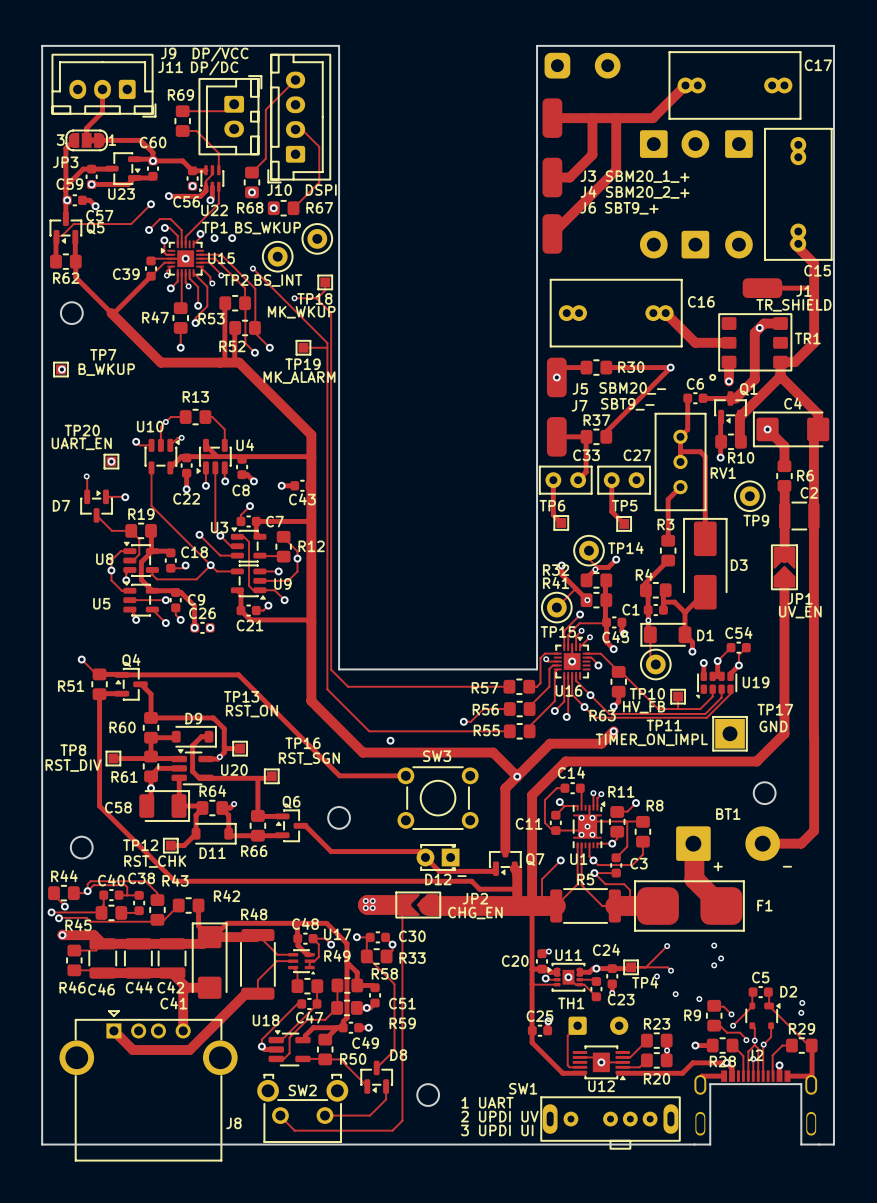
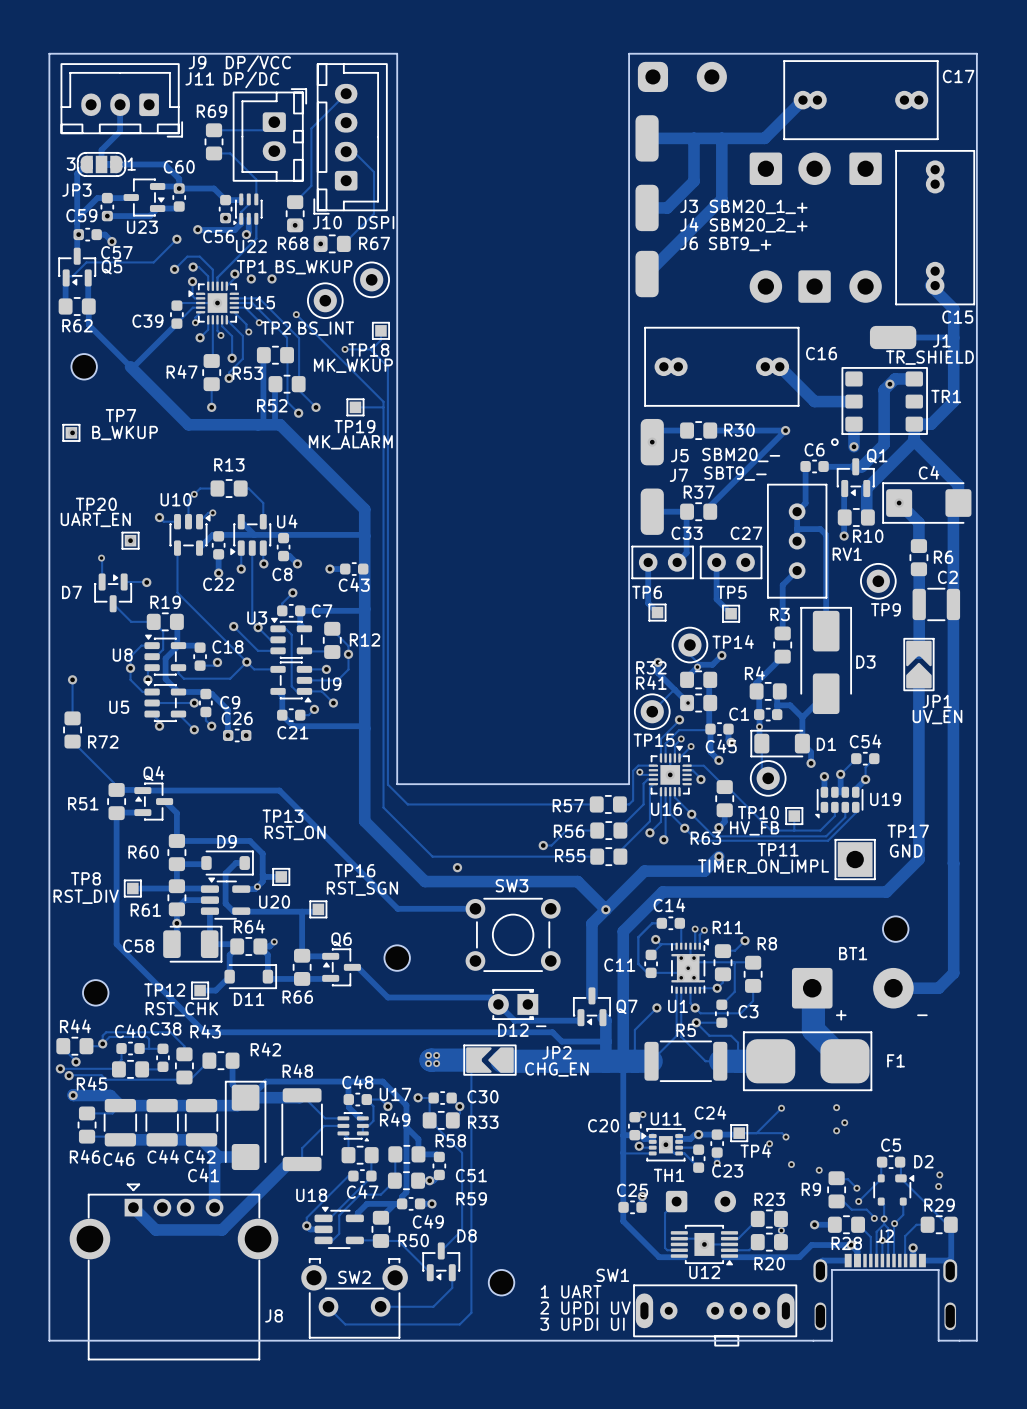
track: none -> (72, 679) (72, 718)
via: none -> (72, 679)
R72: none -> (72, 729)
track: (81, 659) (97, 675) -> (72, 741) (114, 783) (114, 790)
via: (81, 659) -> none

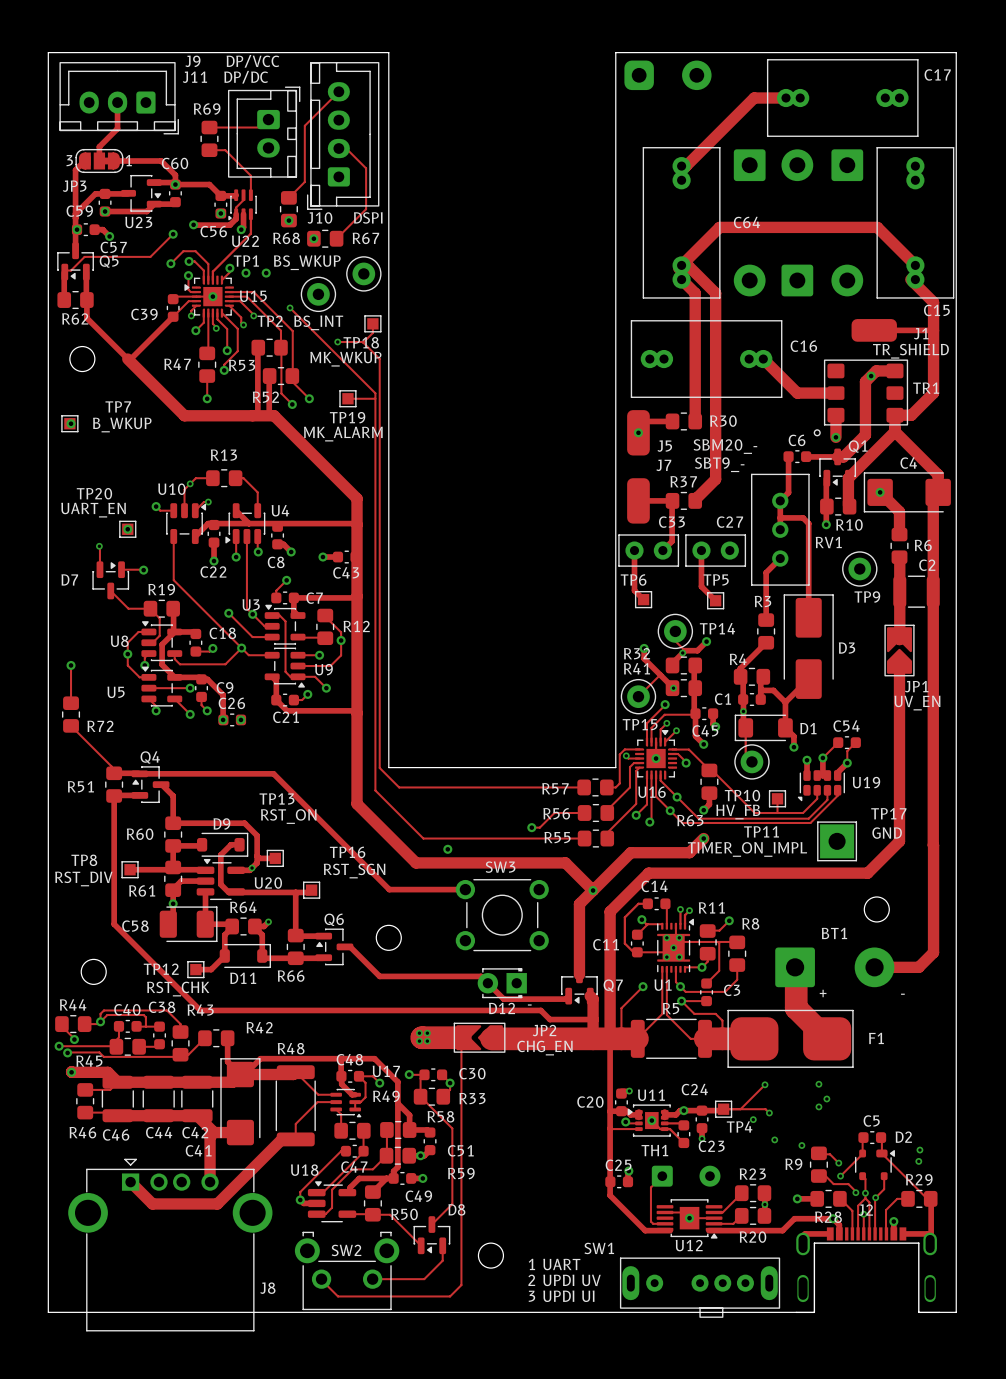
track: (802, 100) (764, 138) (647, 138) -> (786, 98) (754, 98) (686, 166) (681, 166)
J3: SBM20_1_+ (647, 138) -> none
track: (694, 138) (694, 181) (667, 207) (647, 207) -> none
track: (721, 138) (721, 199) (647, 274) -> none
J4: SBM20_2_+ (647, 207) -> none
C64: none -> (681, 222)
track: none -> (681, 265) (687, 265) (715, 293) (715, 479) (695, 500)
track: none -> (915, 265) (877, 227) (719, 227) (678, 268)
J6: SBT9_+ (647, 274) -> none
track: (710, 430) (785, 430) (710, 505) -> (695, 421) (695, 293) (681, 279)
via: (785, 430) -> none

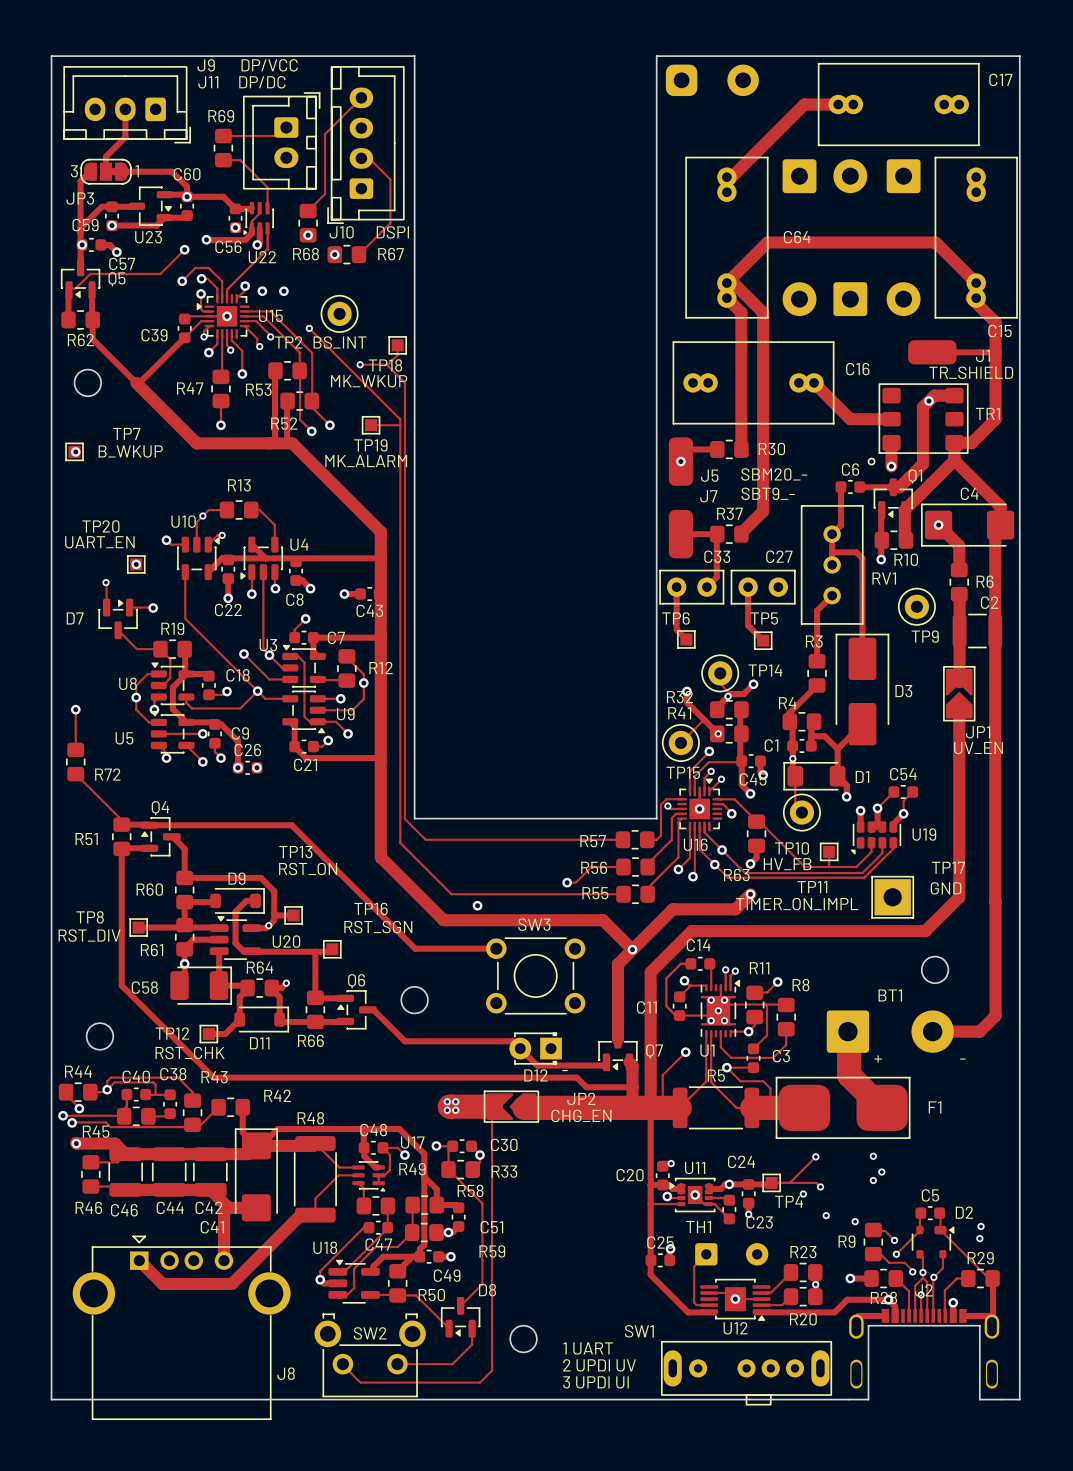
TP1: BS_WKUP (363, 273) -> none
track: (221, 313) (237, 328) (237, 351) (224, 364) (224, 370) -> none
via: (224, 370) -> none
via: (680, 986) -> none

